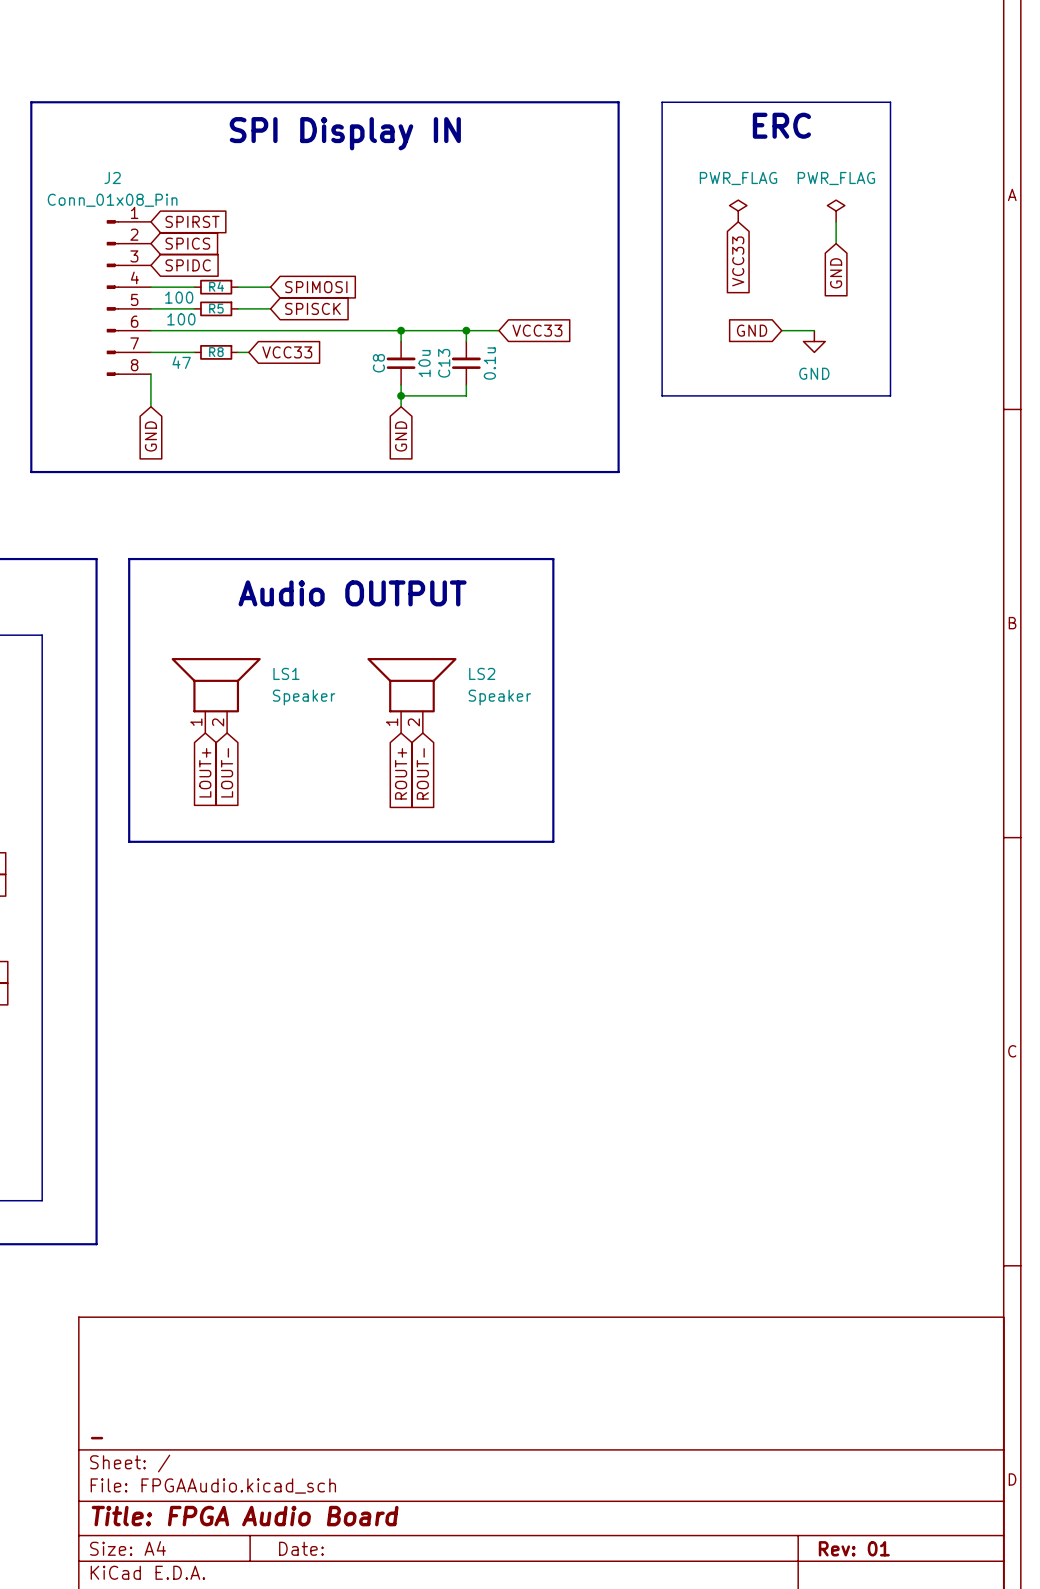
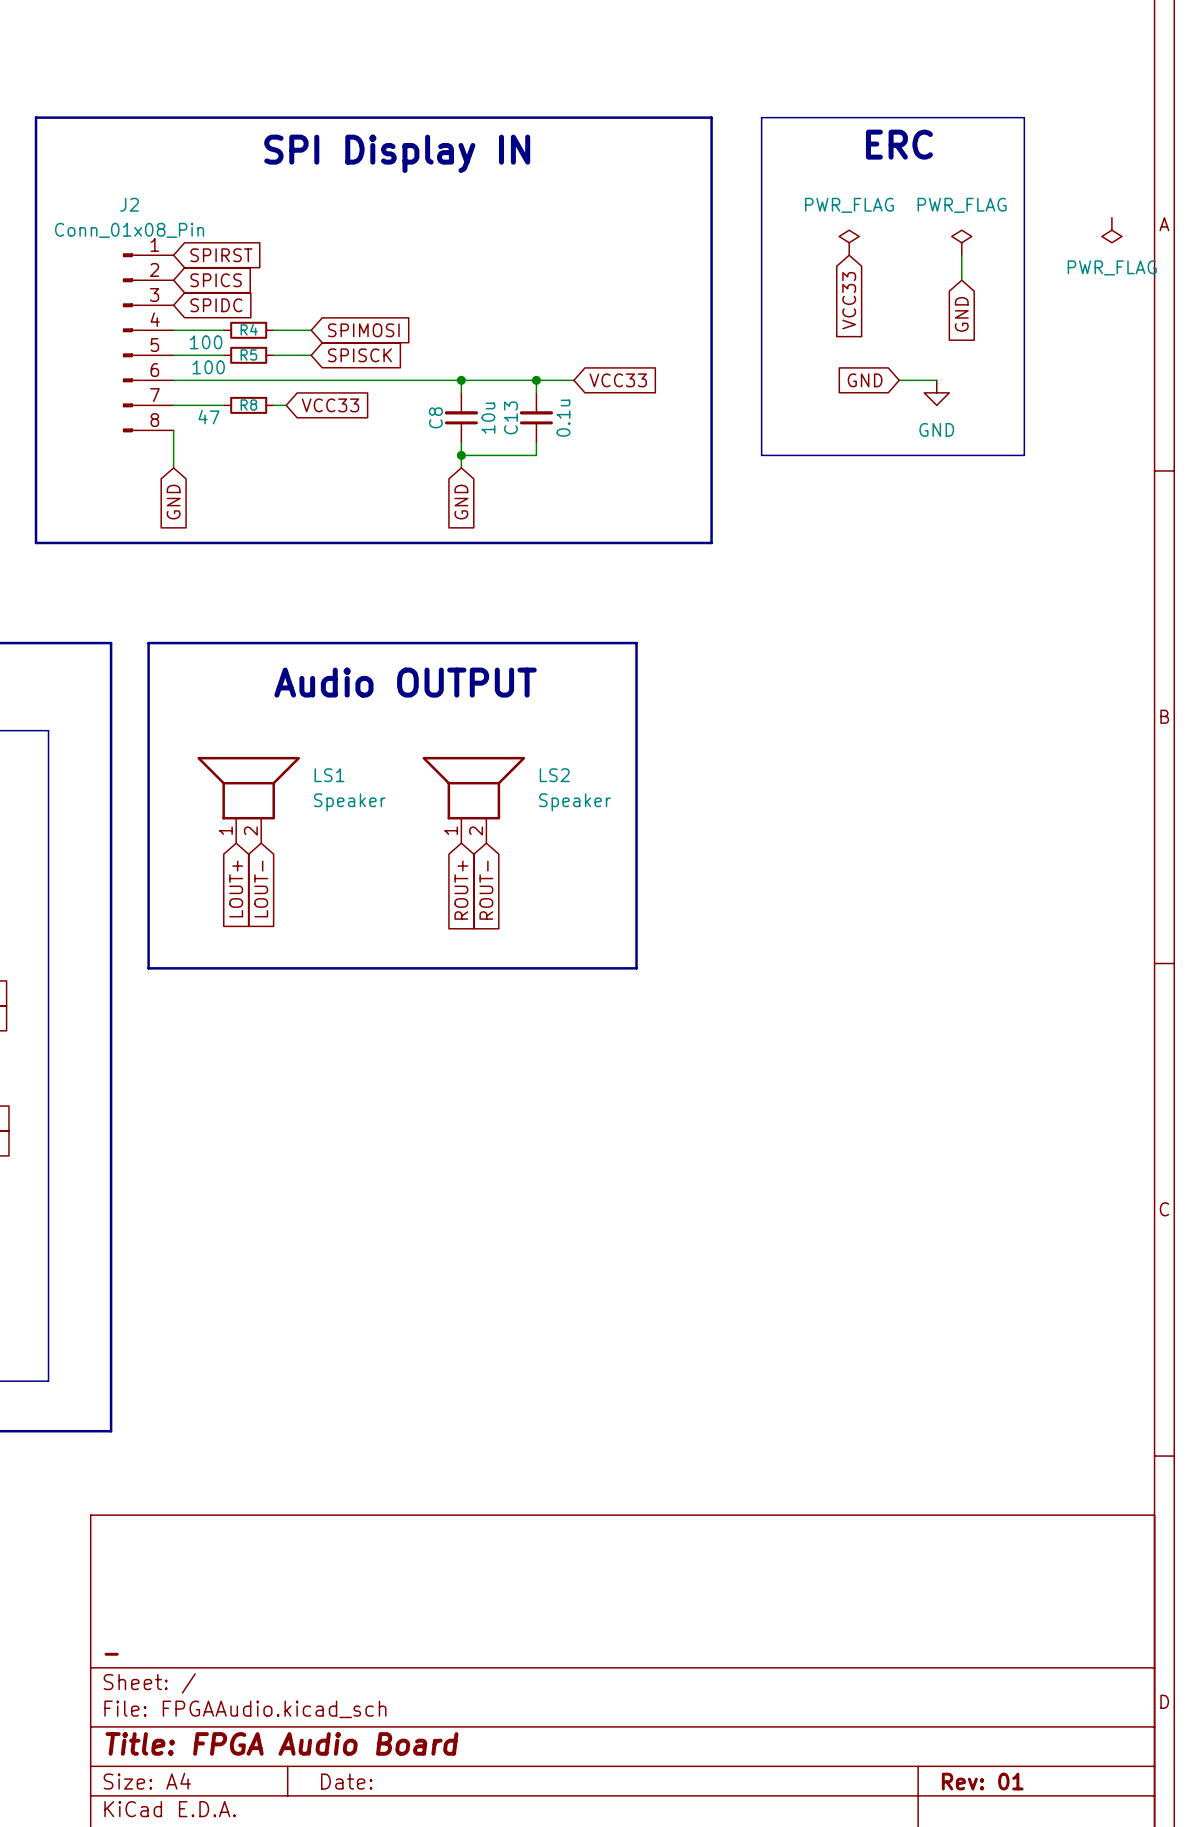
power symbol: none -> PWR_FLAG (1111, 230)

